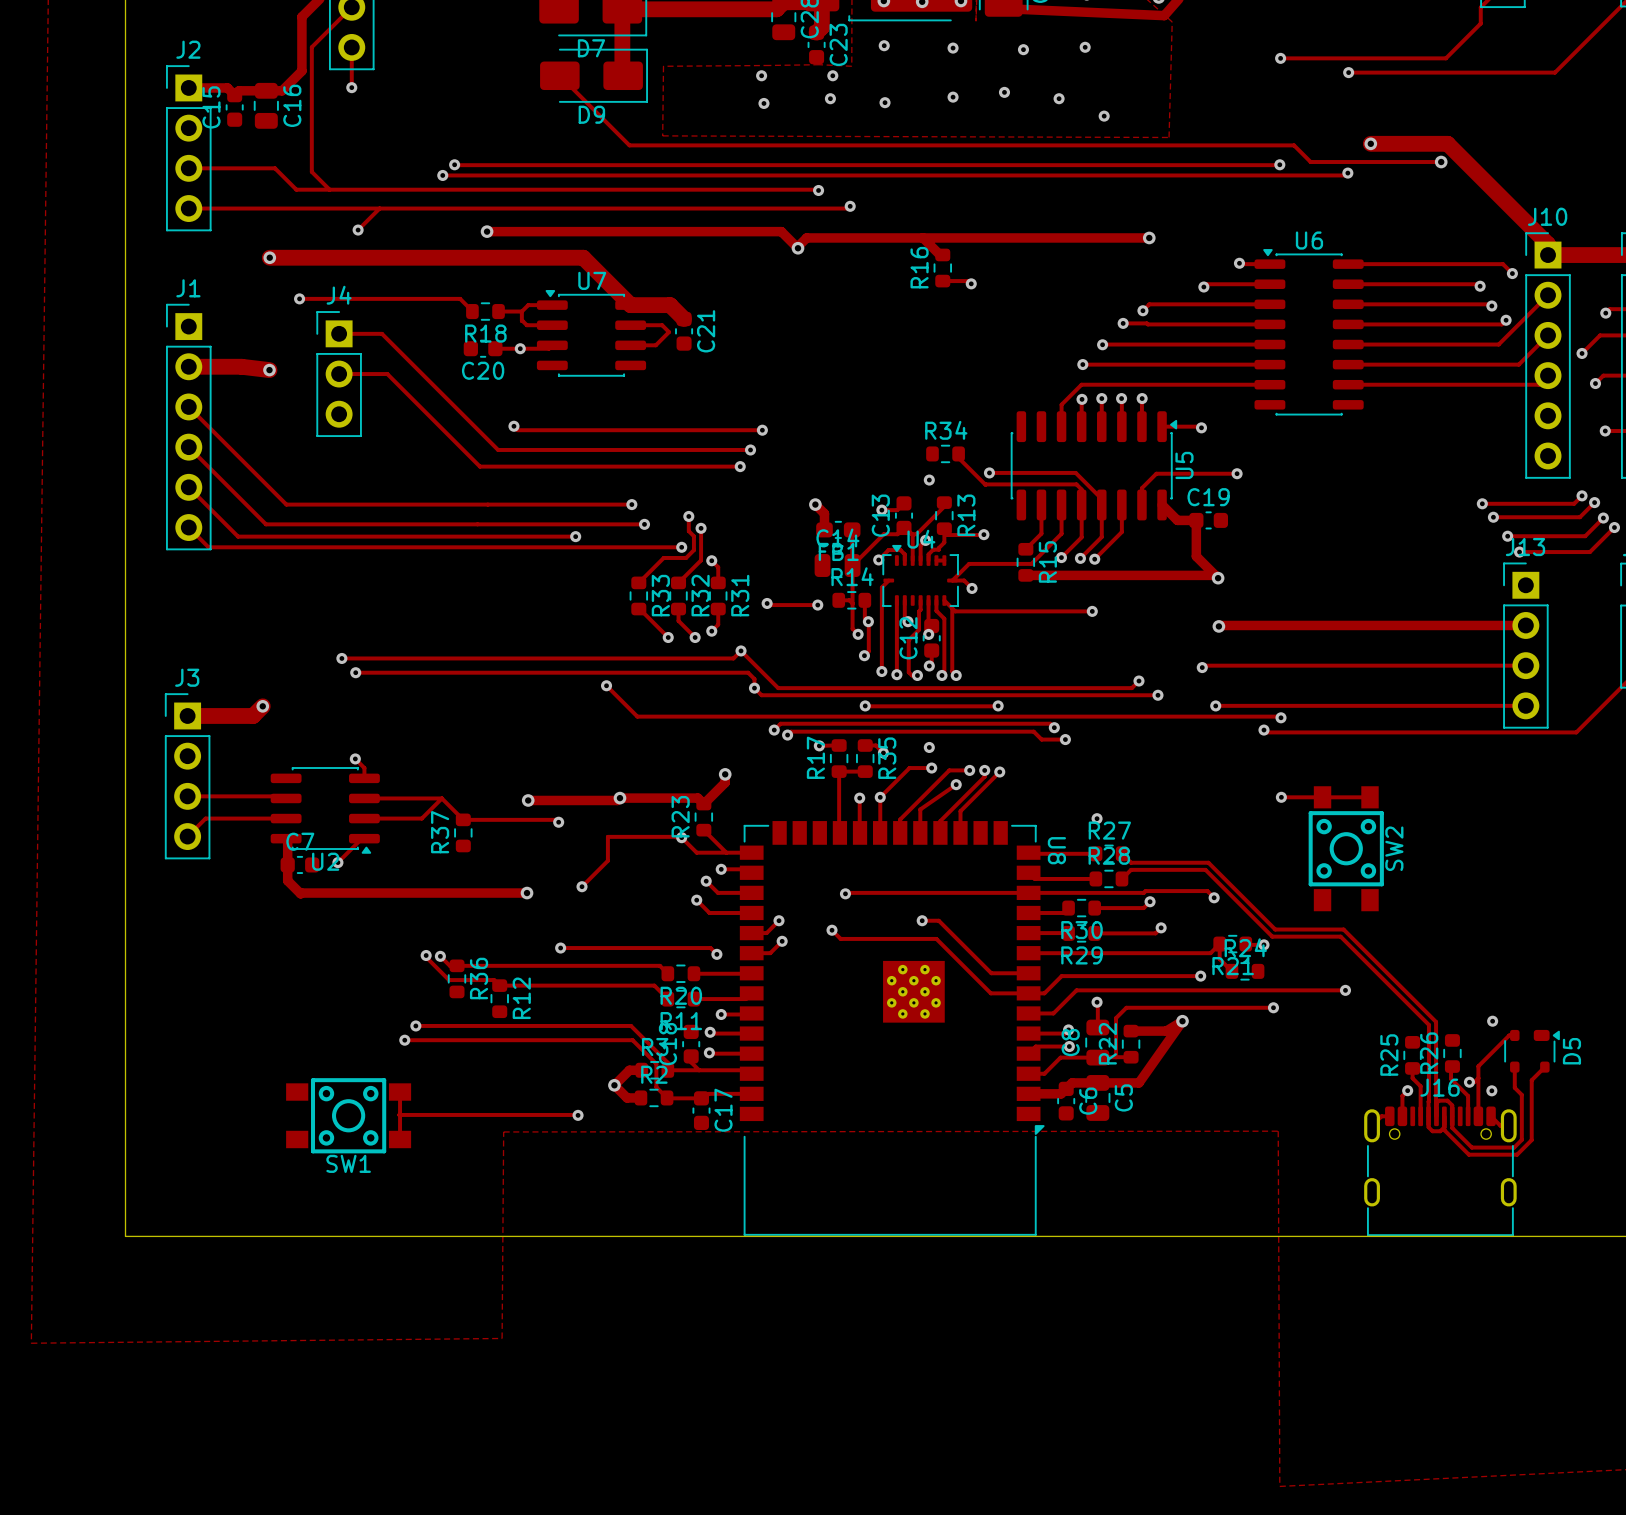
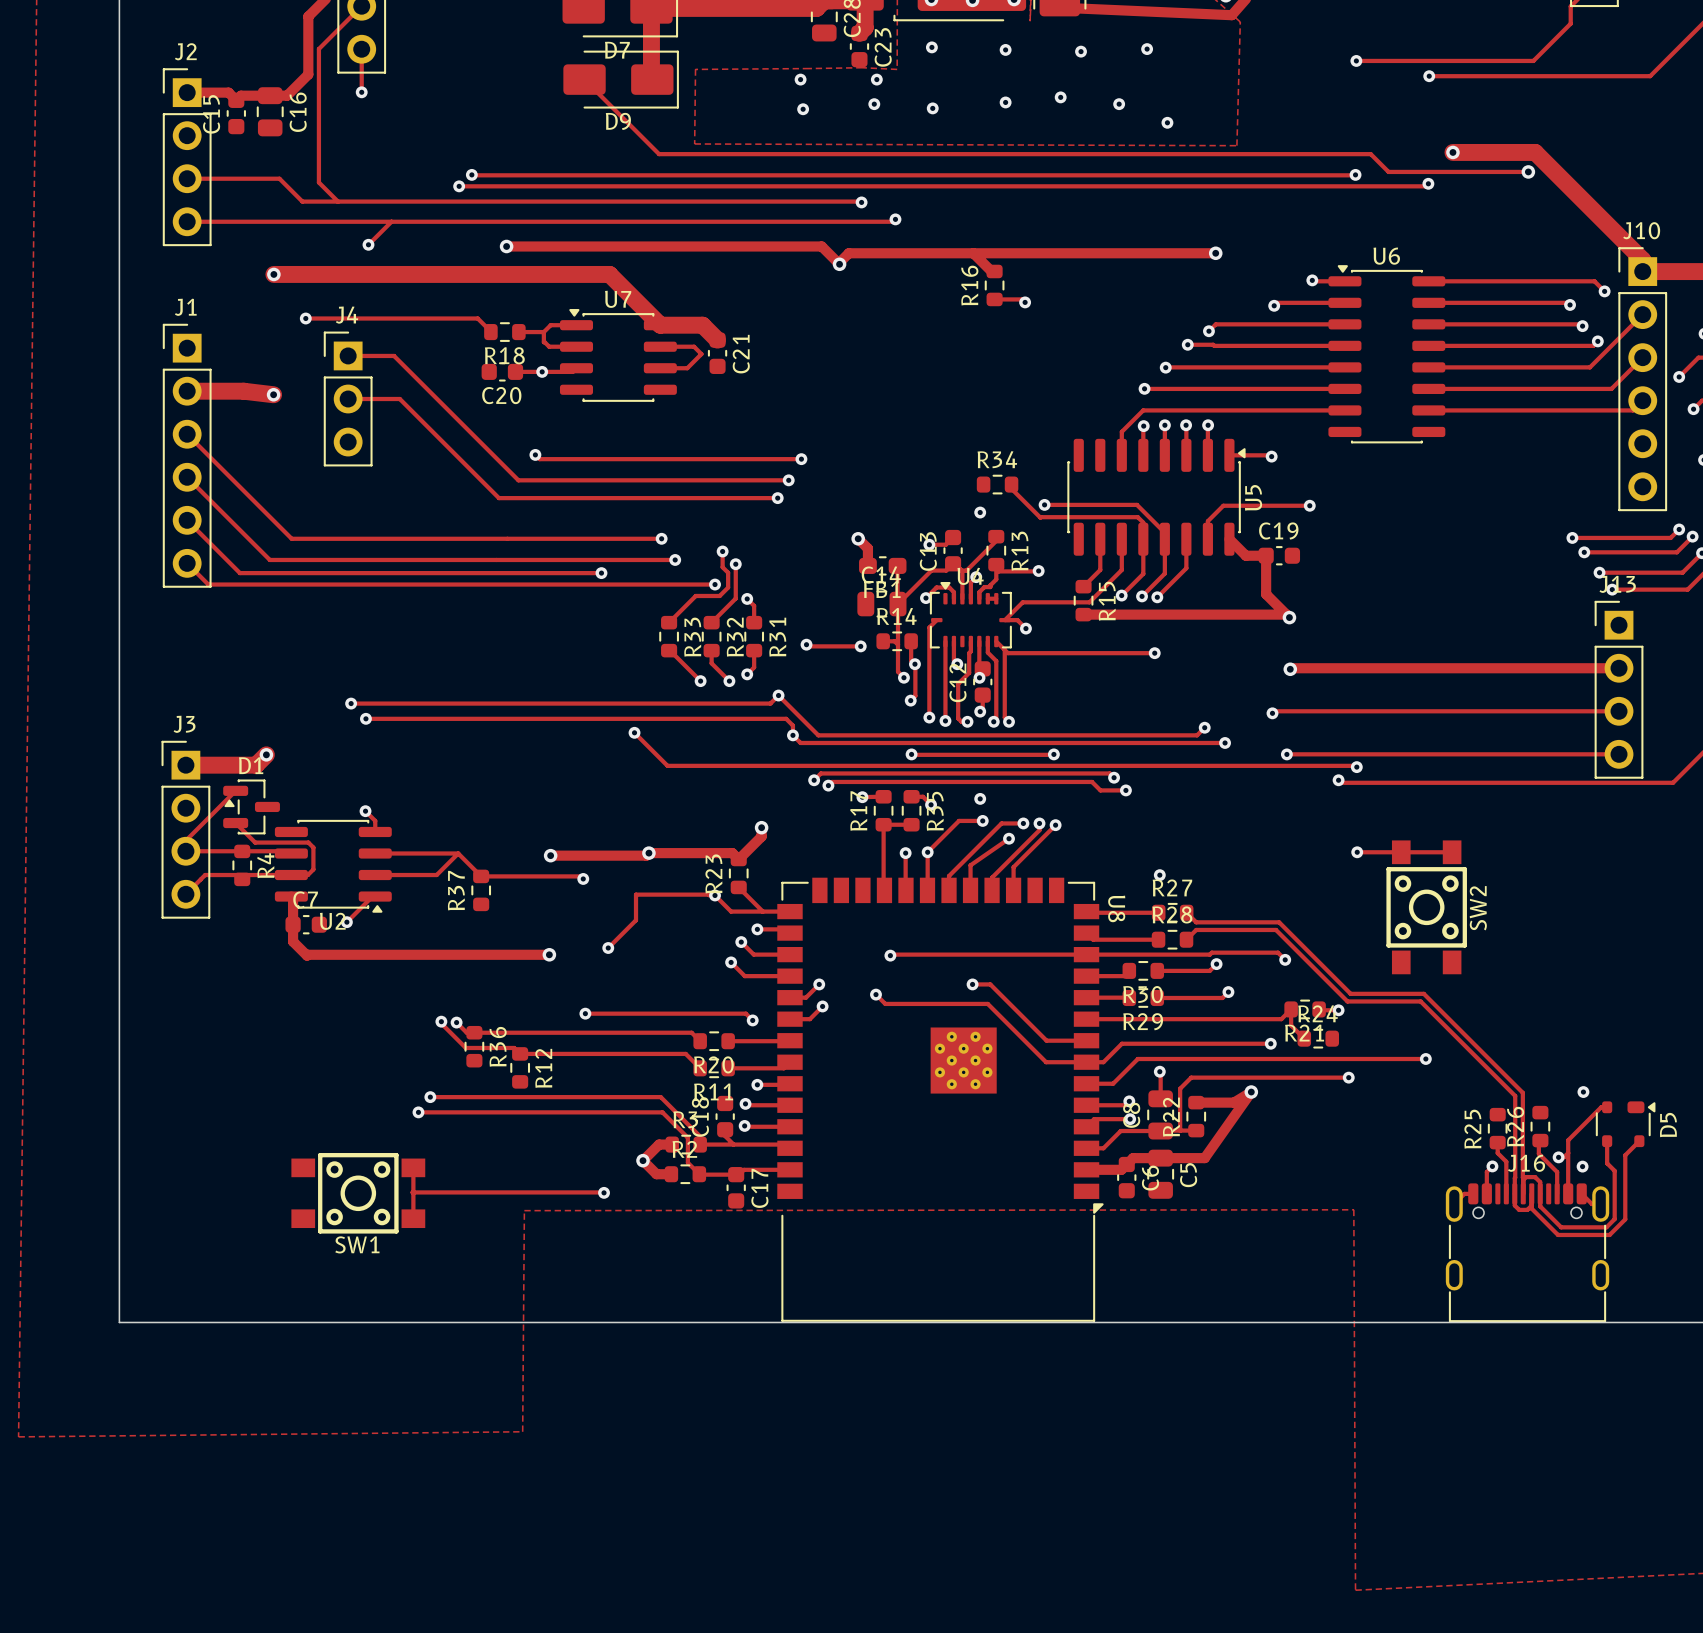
track: none -> (235, 790) (185, 840) (185, 851)
D1: none -> (251, 806)
track: none -> (235, 823) (255, 842) (308, 842) (313, 847) (313, 869) (307, 875) (291, 875)
R4: none -> (242, 865)

